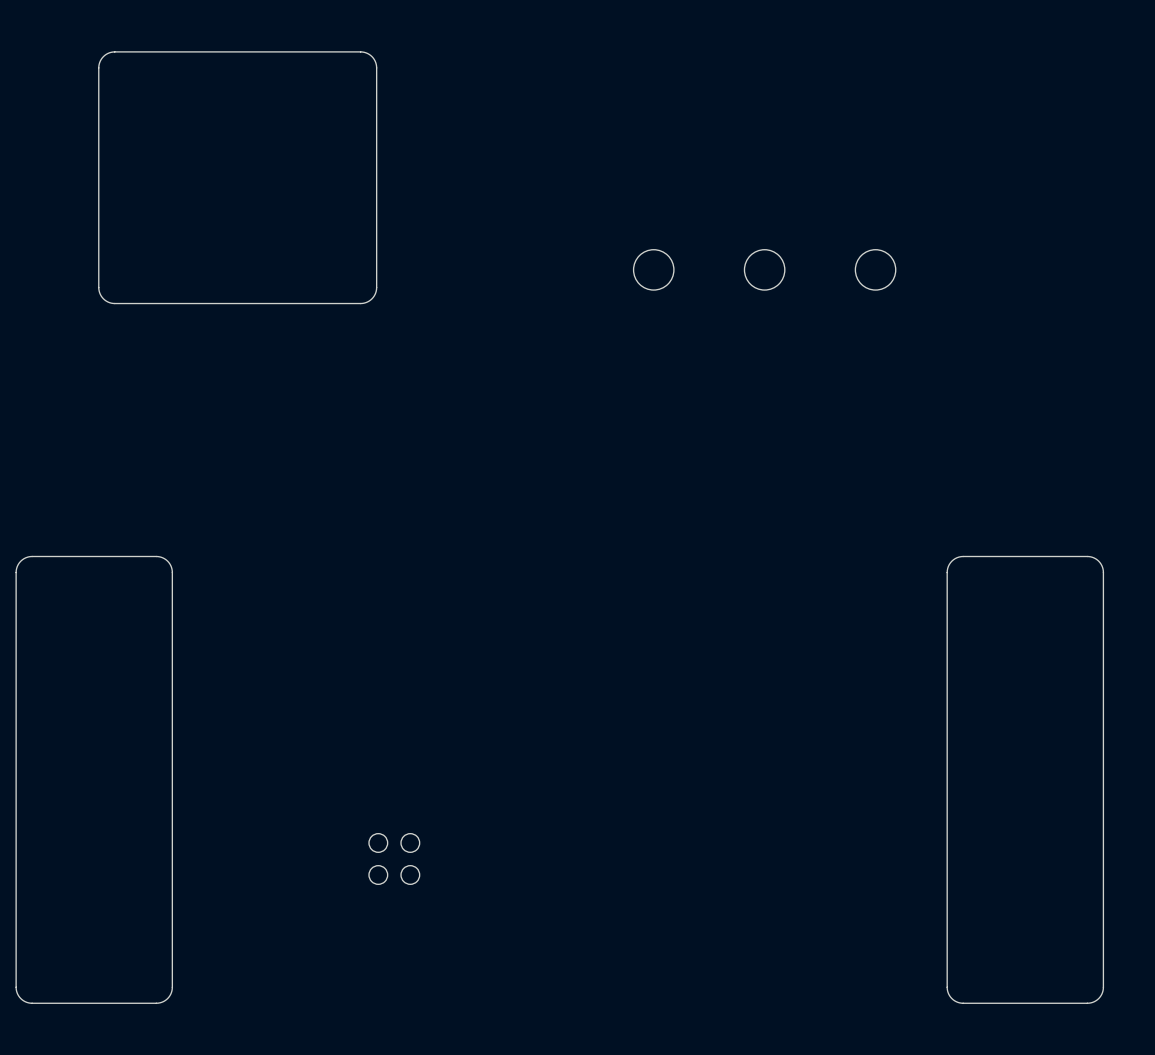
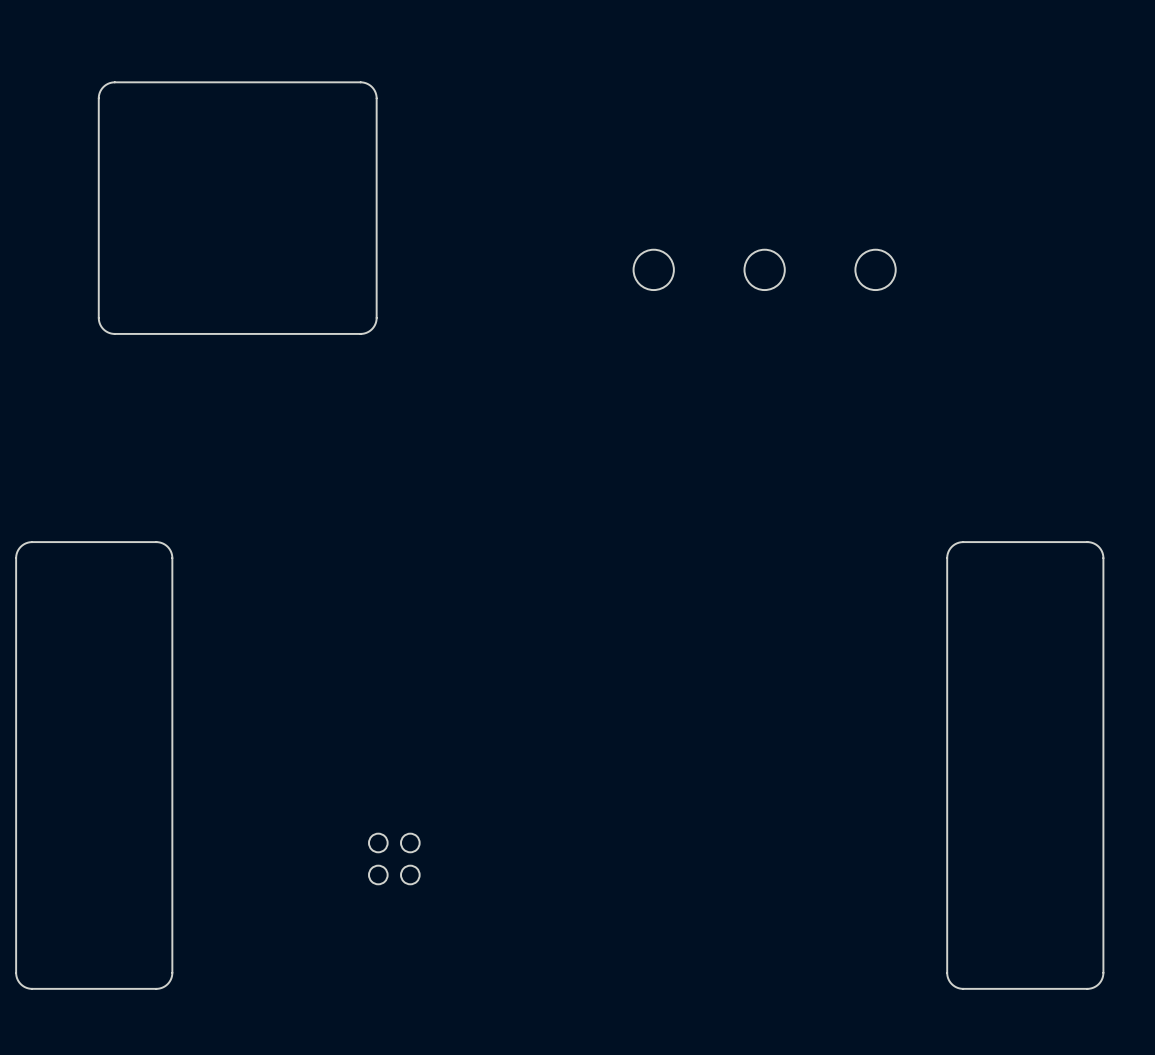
drawing shape: [16, 51, 1104, 1004] -> [16, 82, 1104, 989]

